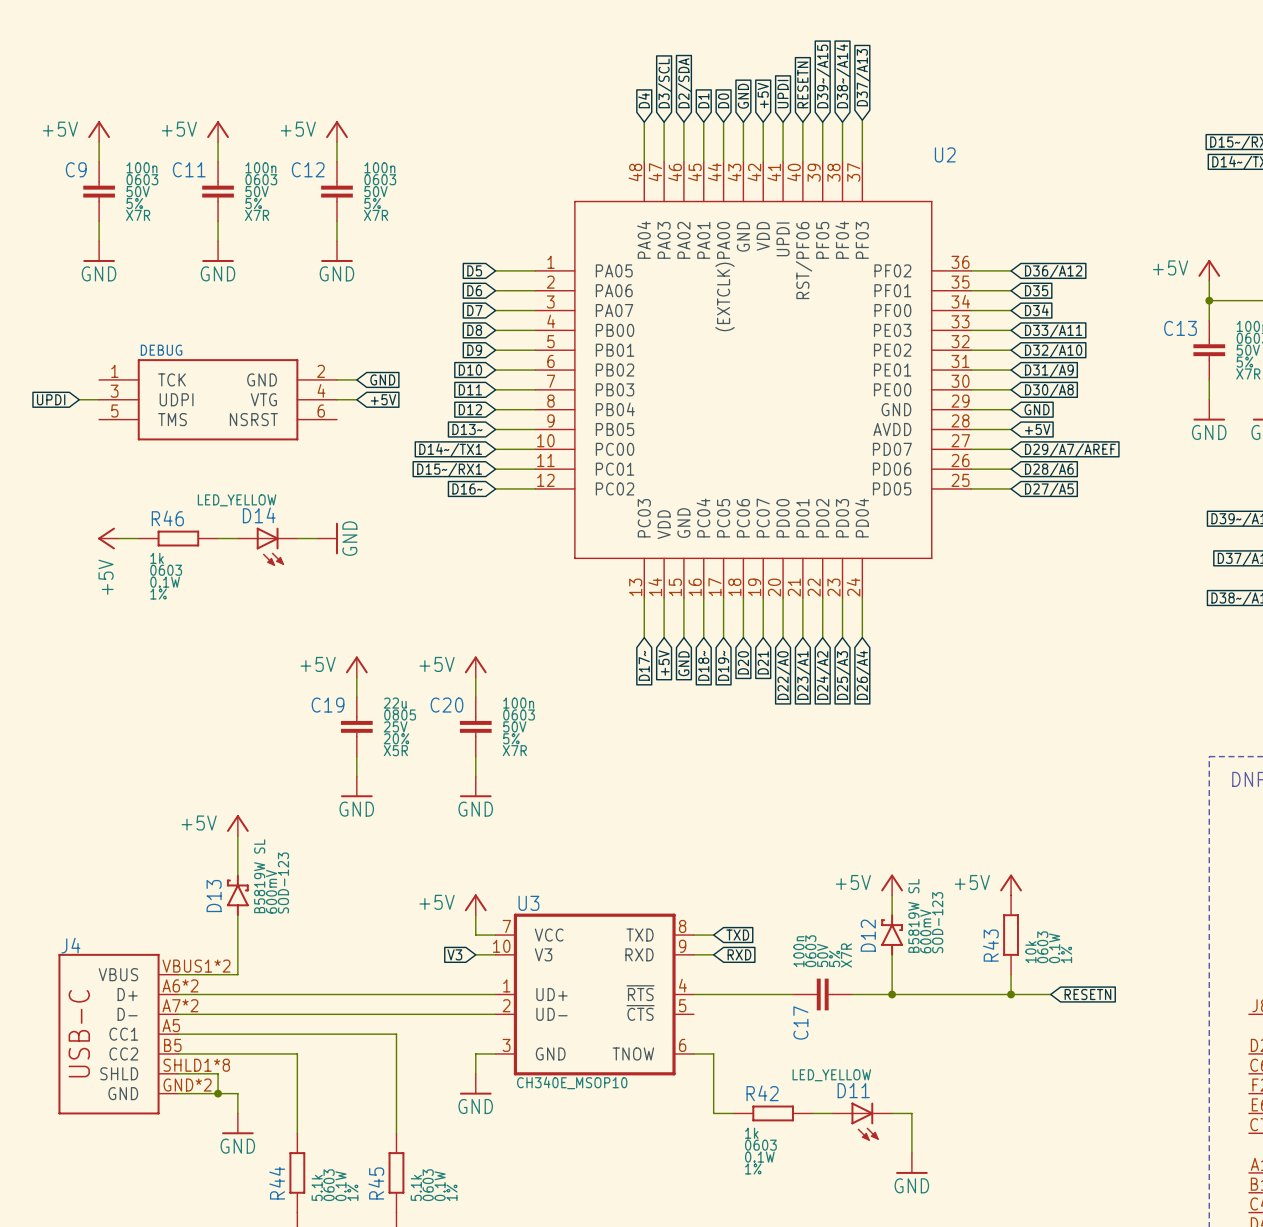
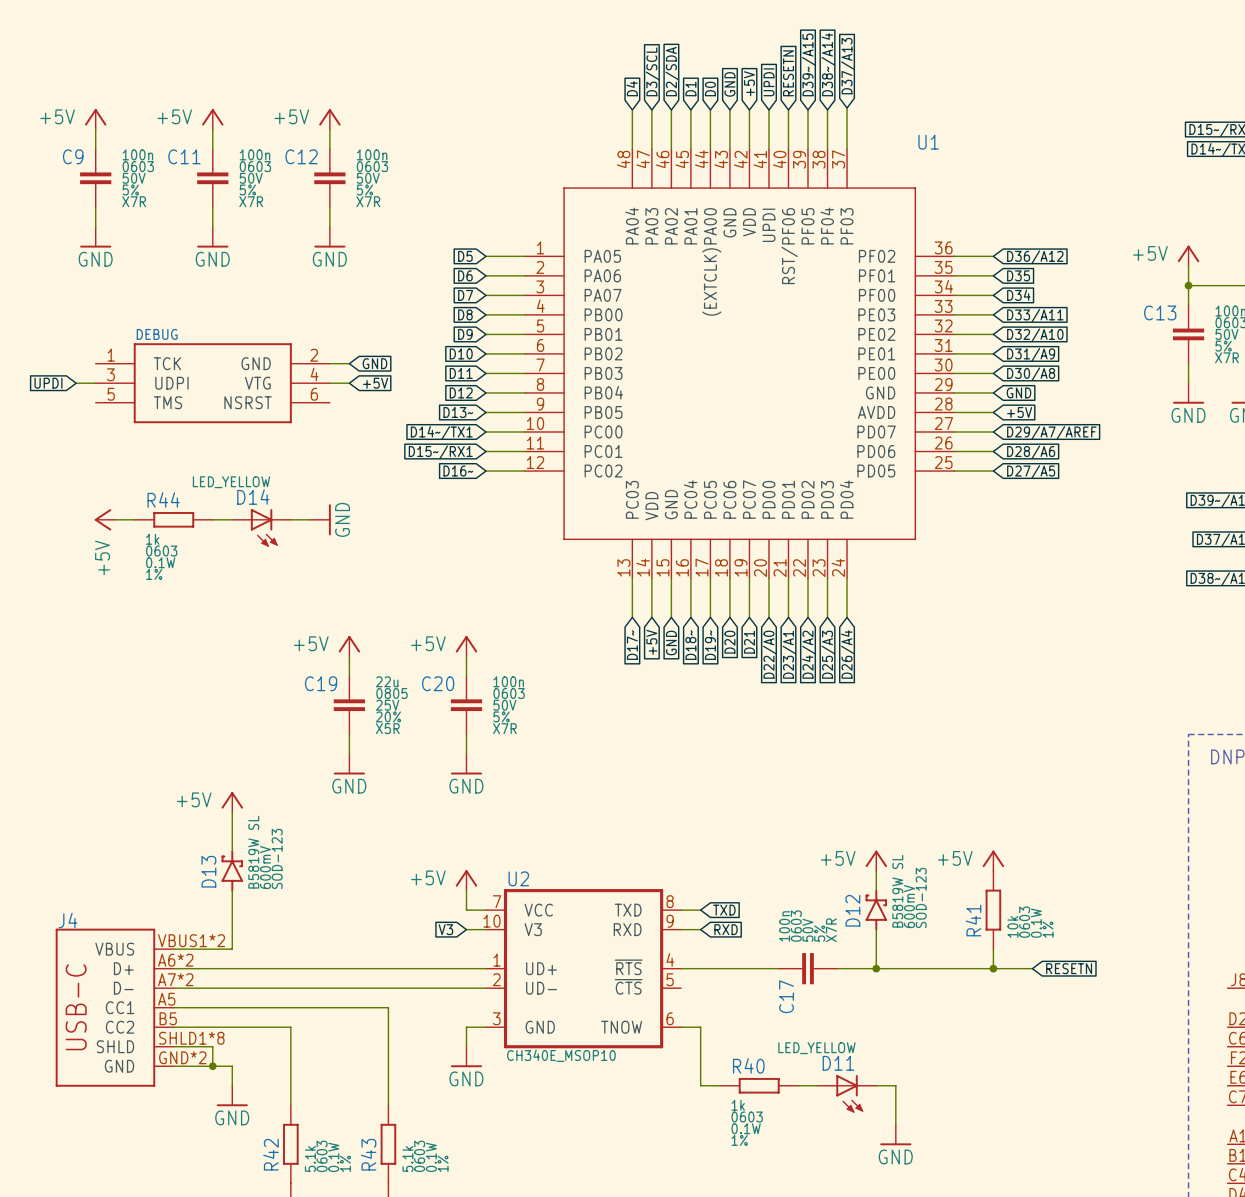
U2 name: U2 (945, 154) -> U1 (928, 142)
R46 name: R46 (167, 518) -> R44 (163, 499)
U3 name: U3 (528, 903) -> U2 (518, 878)
R43 name: R43 (990, 945) -> R41 (973, 920)
R42 name: R42 (762, 1093) -> R40 (748, 1065)
R44 name: R44 (277, 1183) -> R42 (271, 1154)
R45 name: R45 (376, 1183) -> R43 (368, 1154)

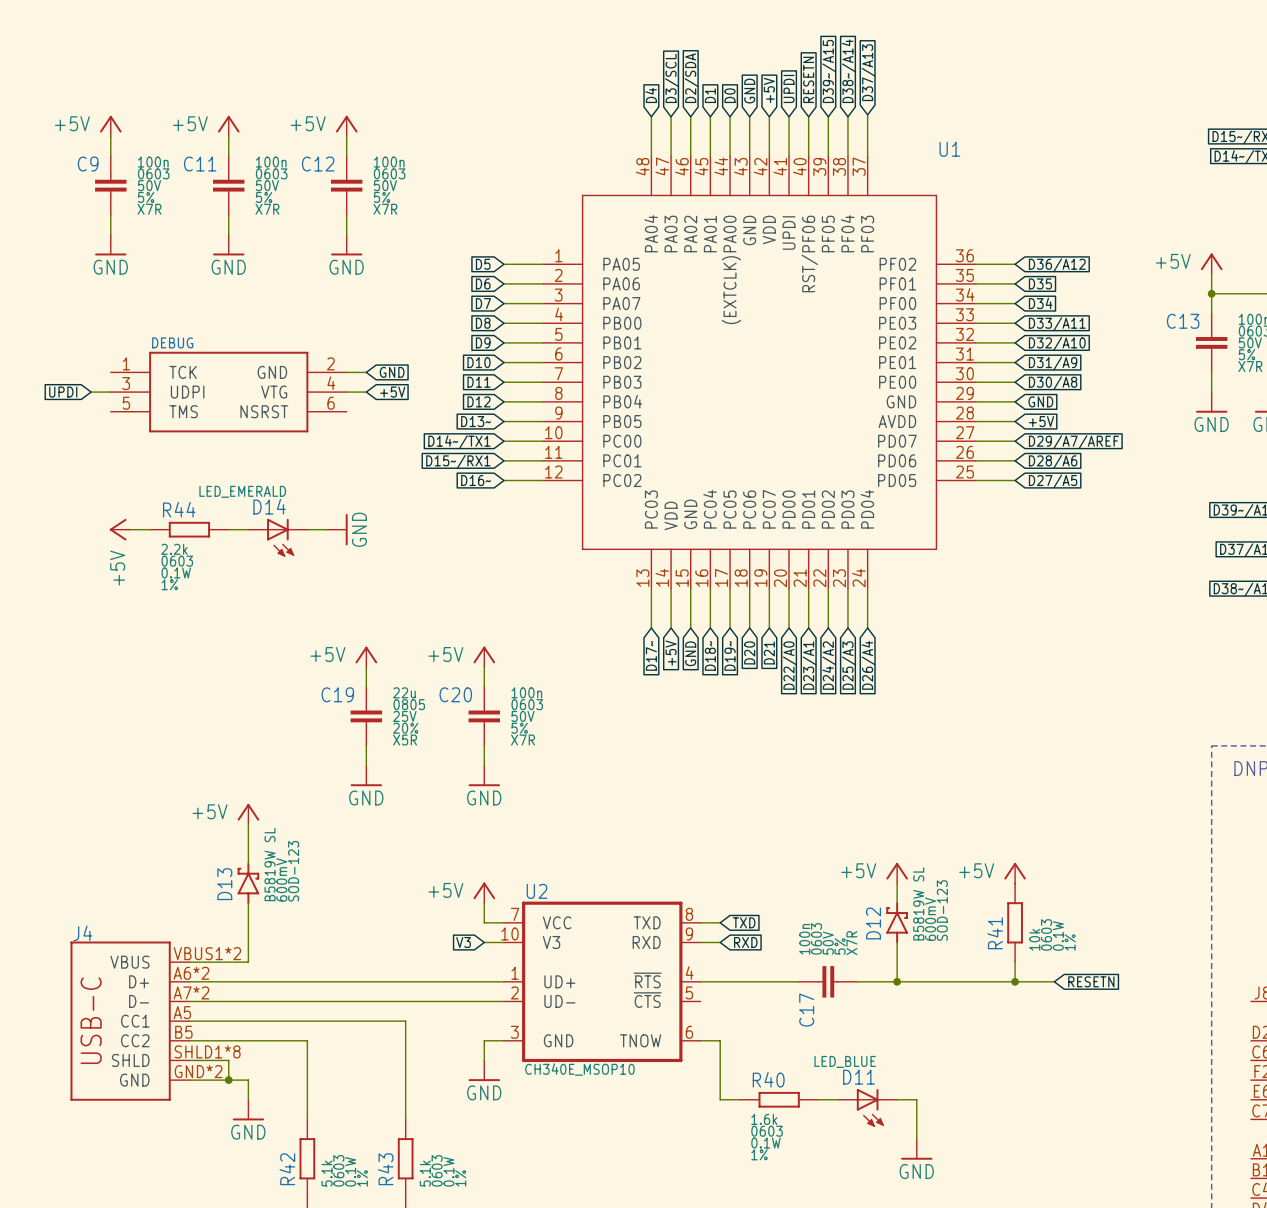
D14 value: LED_YELLOW (231, 482) -> LED_EMERALD (242, 491)
R44 value: 1k (152, 539) -> 2.2k (174, 549)
D11 value: LED_YELLOW (816, 1048) -> LED_BLUE (845, 1061)
R40 value: 1k (738, 1105) -> 1.6k (764, 1119)

